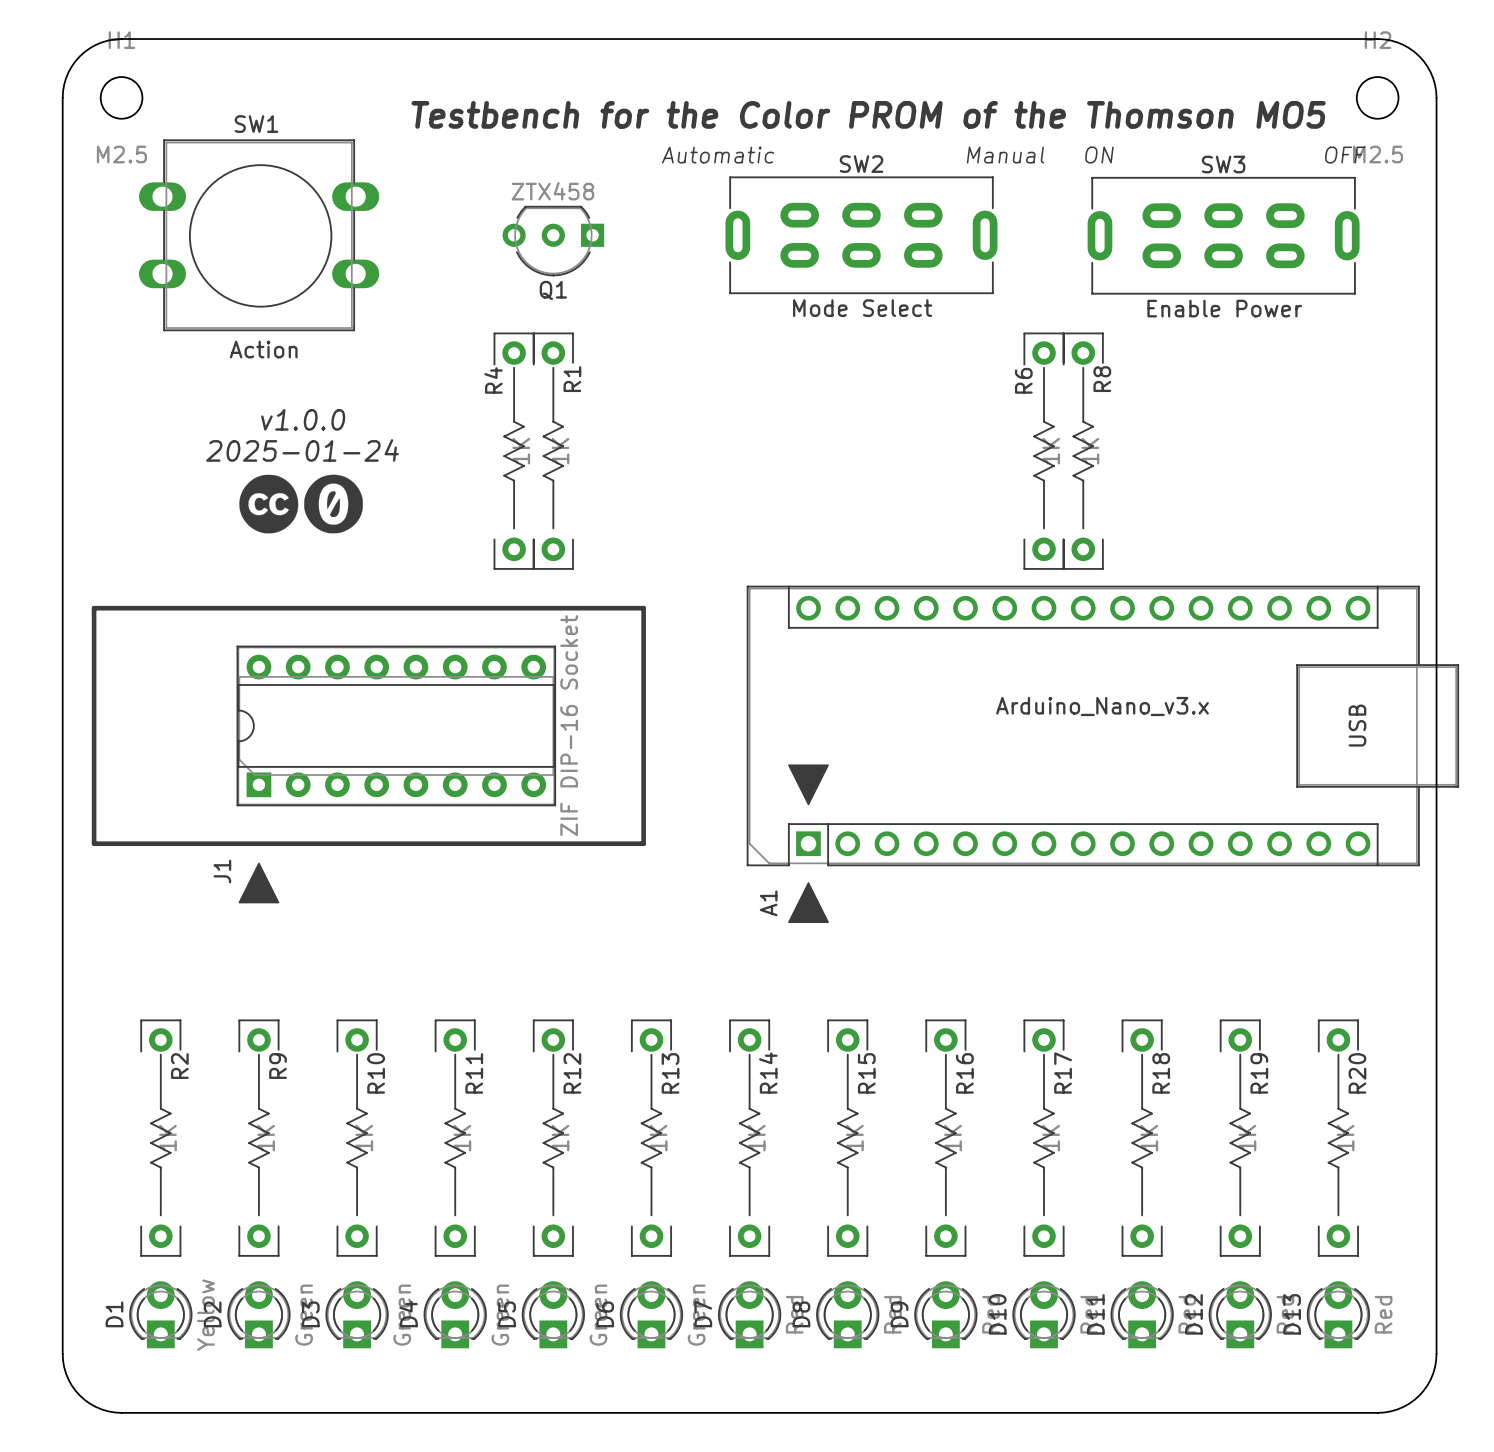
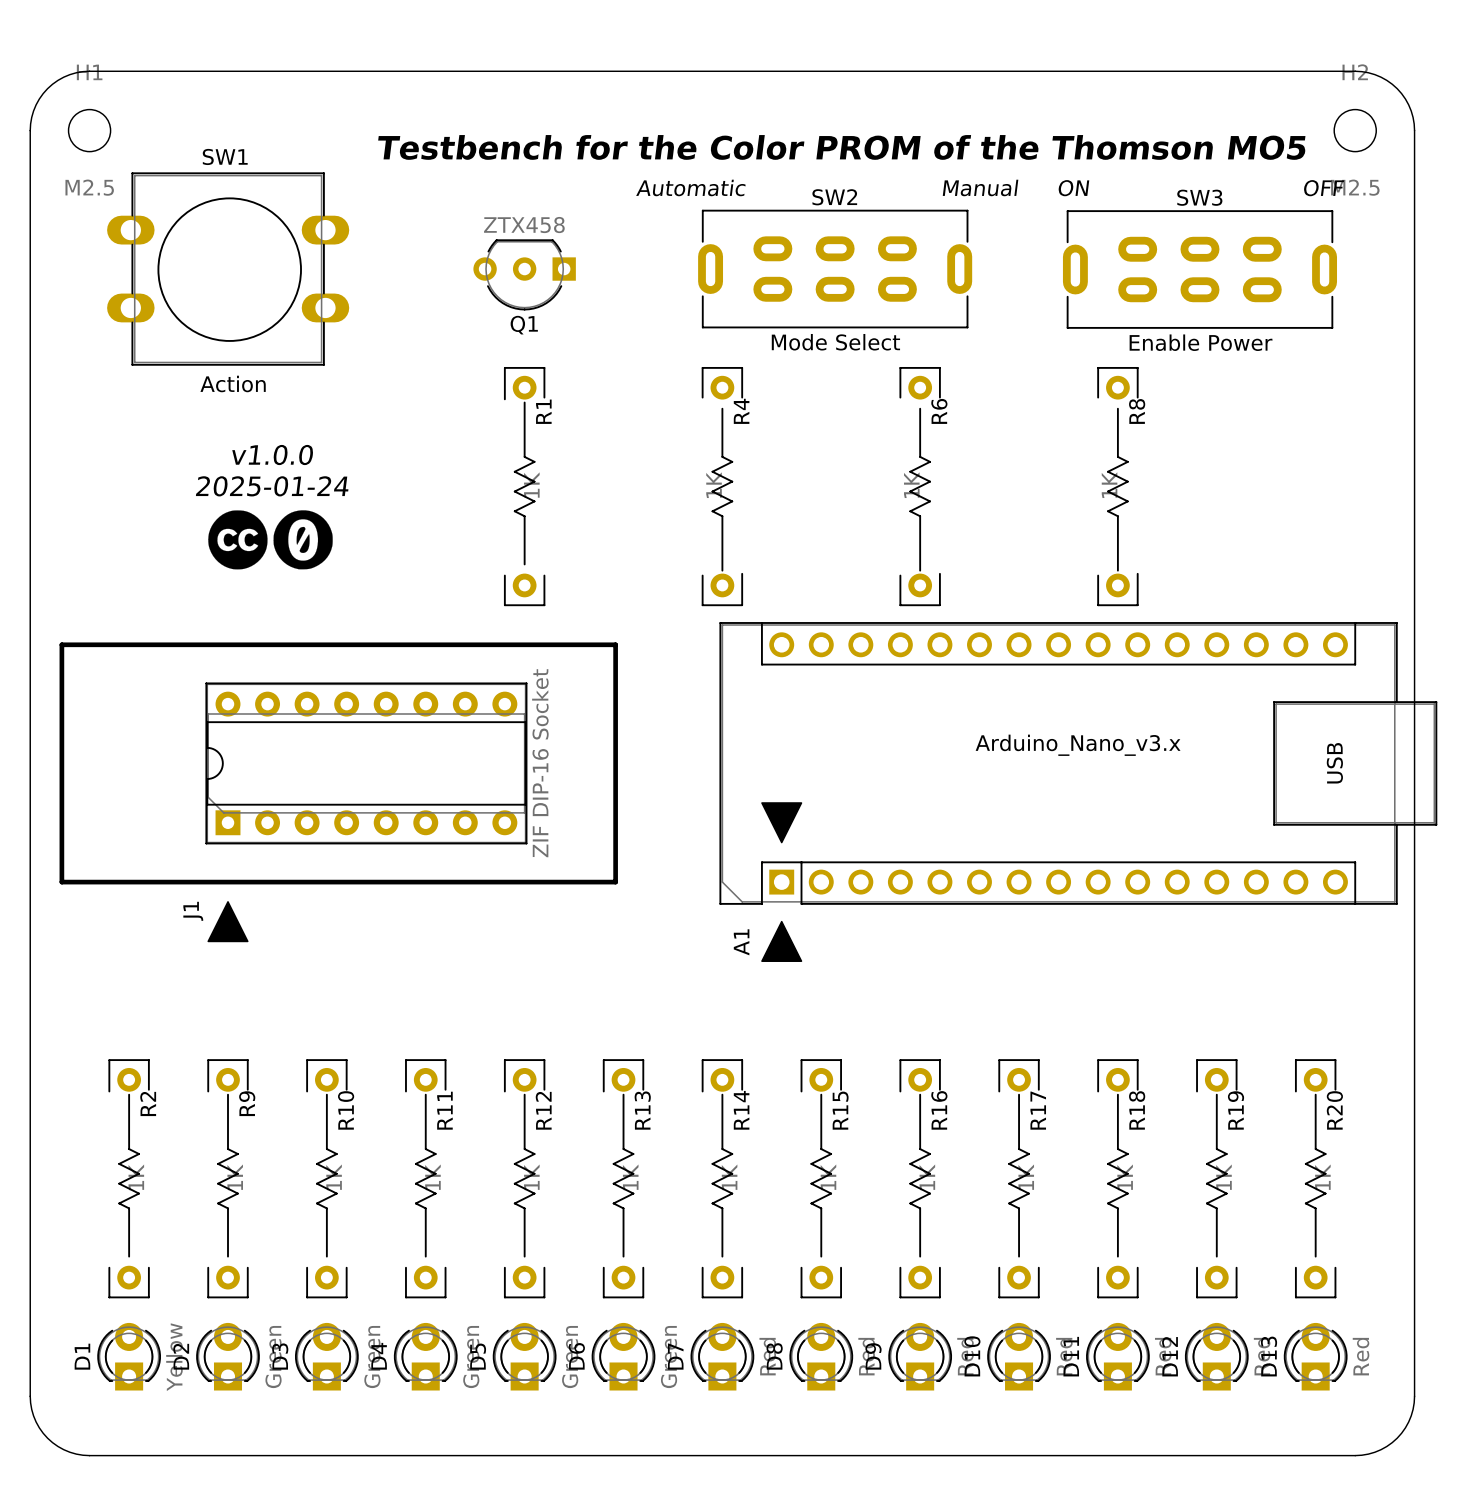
R4 name position: R4 (493, 380) -> R4 (741, 411)
R6 name position: R6 (1023, 380) -> R6 (939, 411)
R4 rotation: 0° (514, 451) -> 180° (722, 486)
R4 position: (514, 451) -> (722, 486)
R6 rotation: 0° (1044, 451) -> 180° (920, 486)
R8 rotation: 0° (1083, 451) -> 180° (1117, 486)

